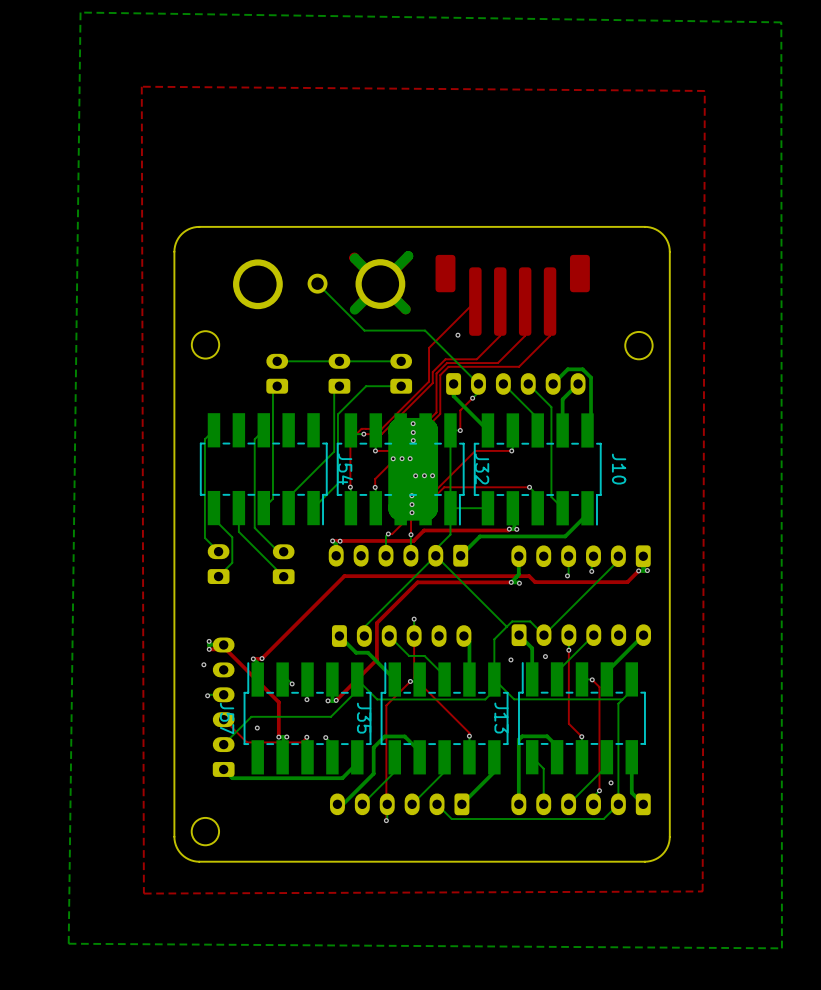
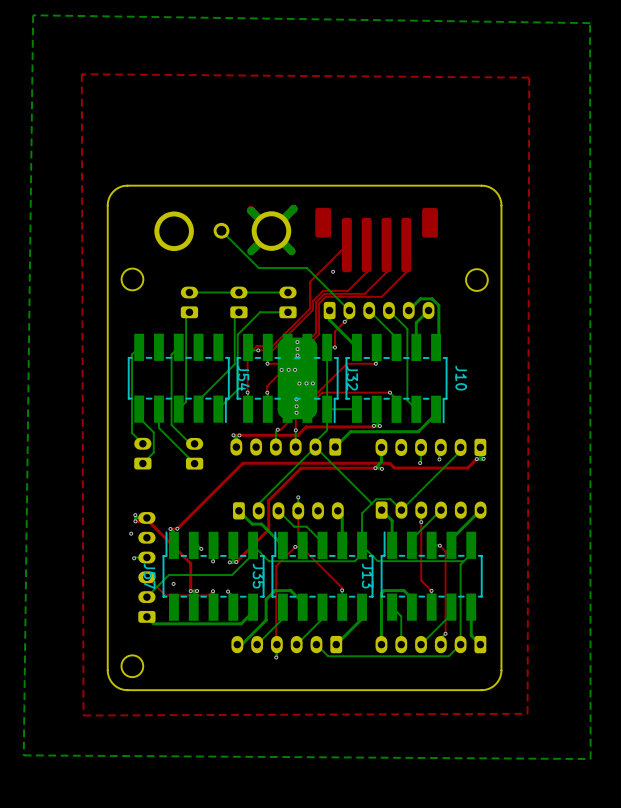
via: (545, 656) -> none
via: (510, 659) -> none
via: (611, 782) -> none

